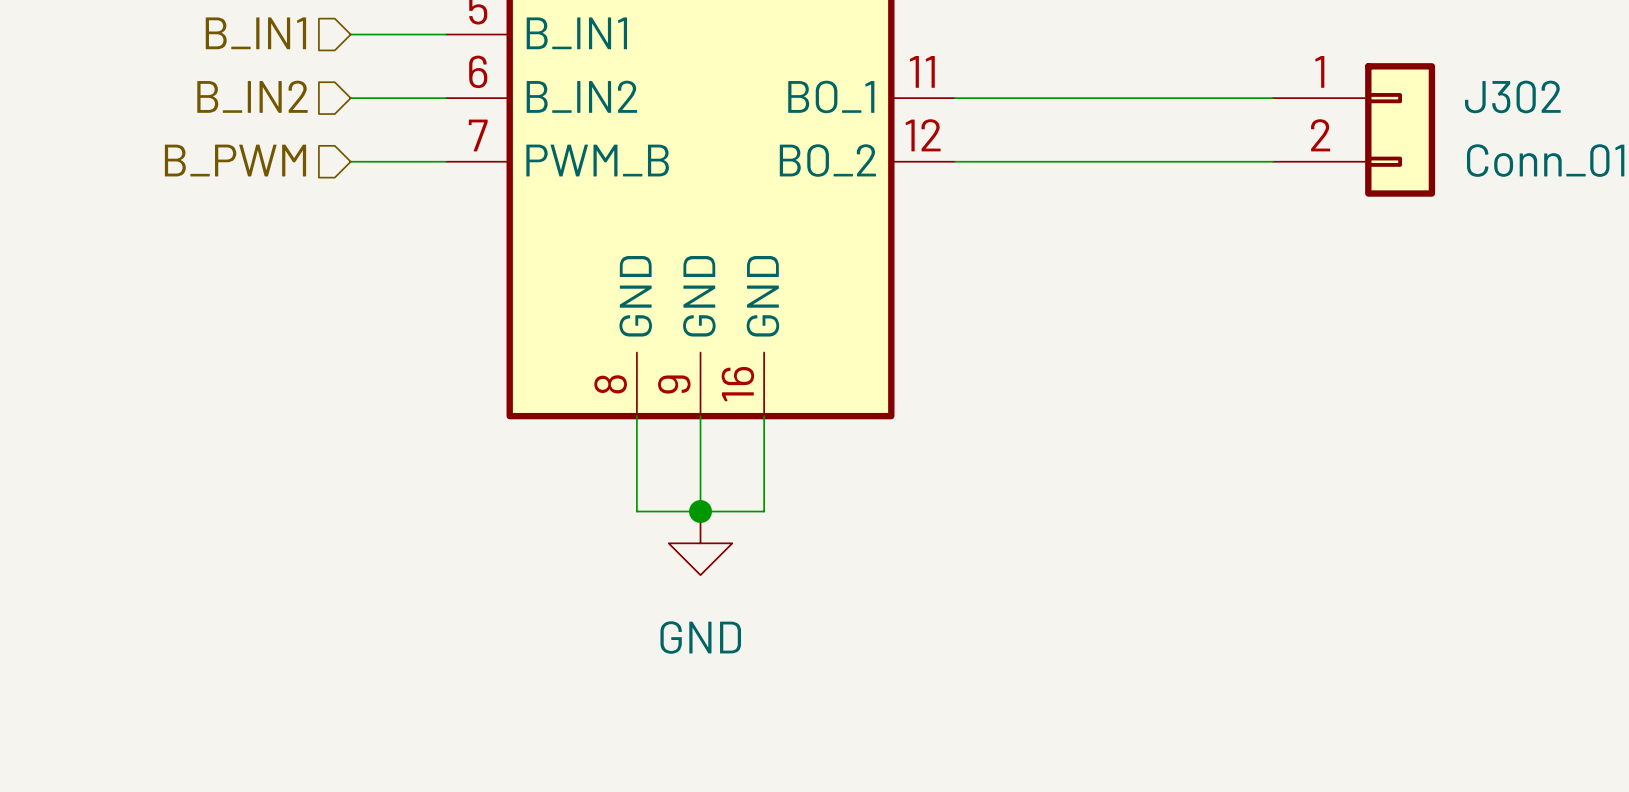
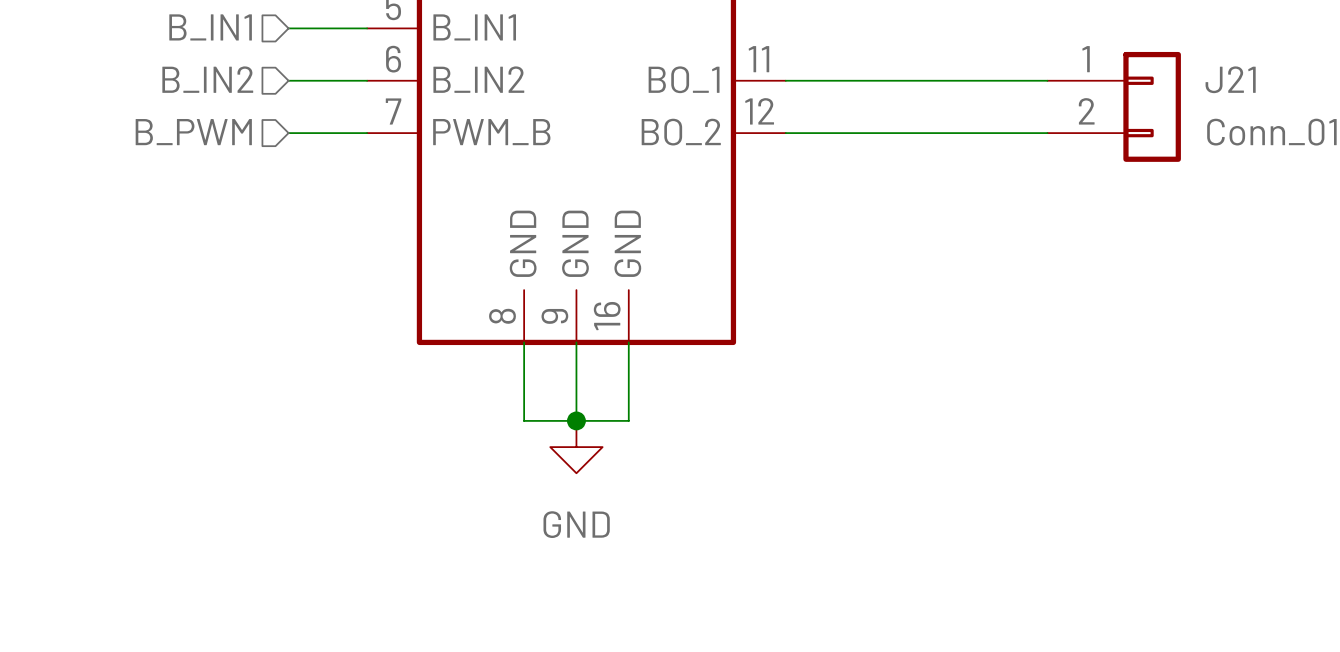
J302 name: J302 (1512, 96) -> J21 (1230, 79)

